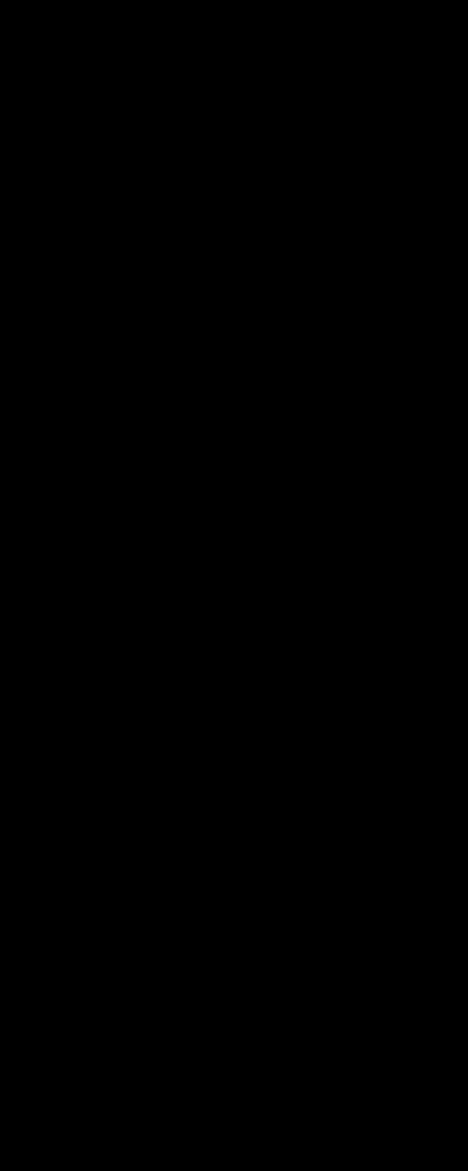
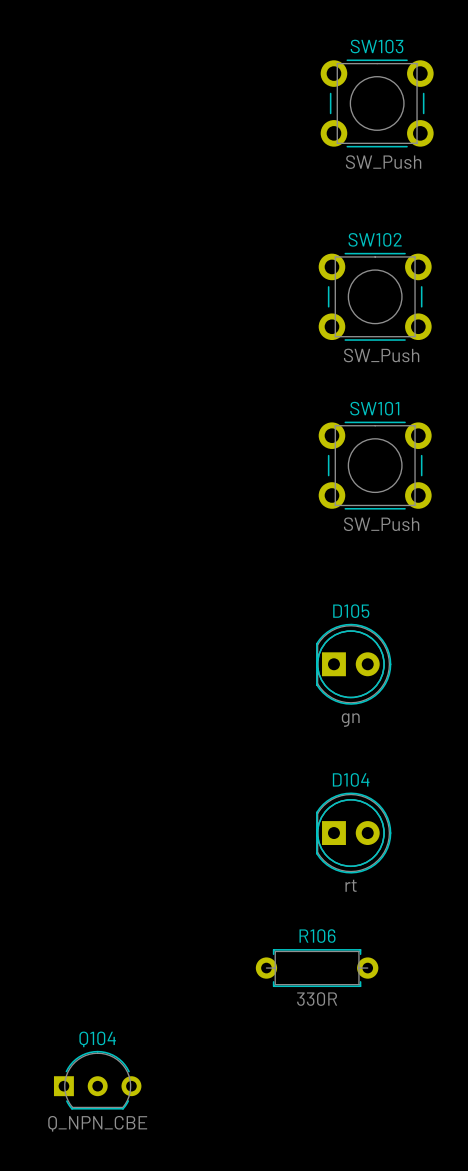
SW103: none -> SW_Push (377, 103)
SW102: none -> SW_Push (375, 296)
SW101: none -> SW_Push (375, 465)
D105: none -> gn (353, 664)
D104: none -> rt (353, 833)
R106: none -> 330R (317, 968)
Q104: none -> Q_NPN_CBE (97, 1080)

